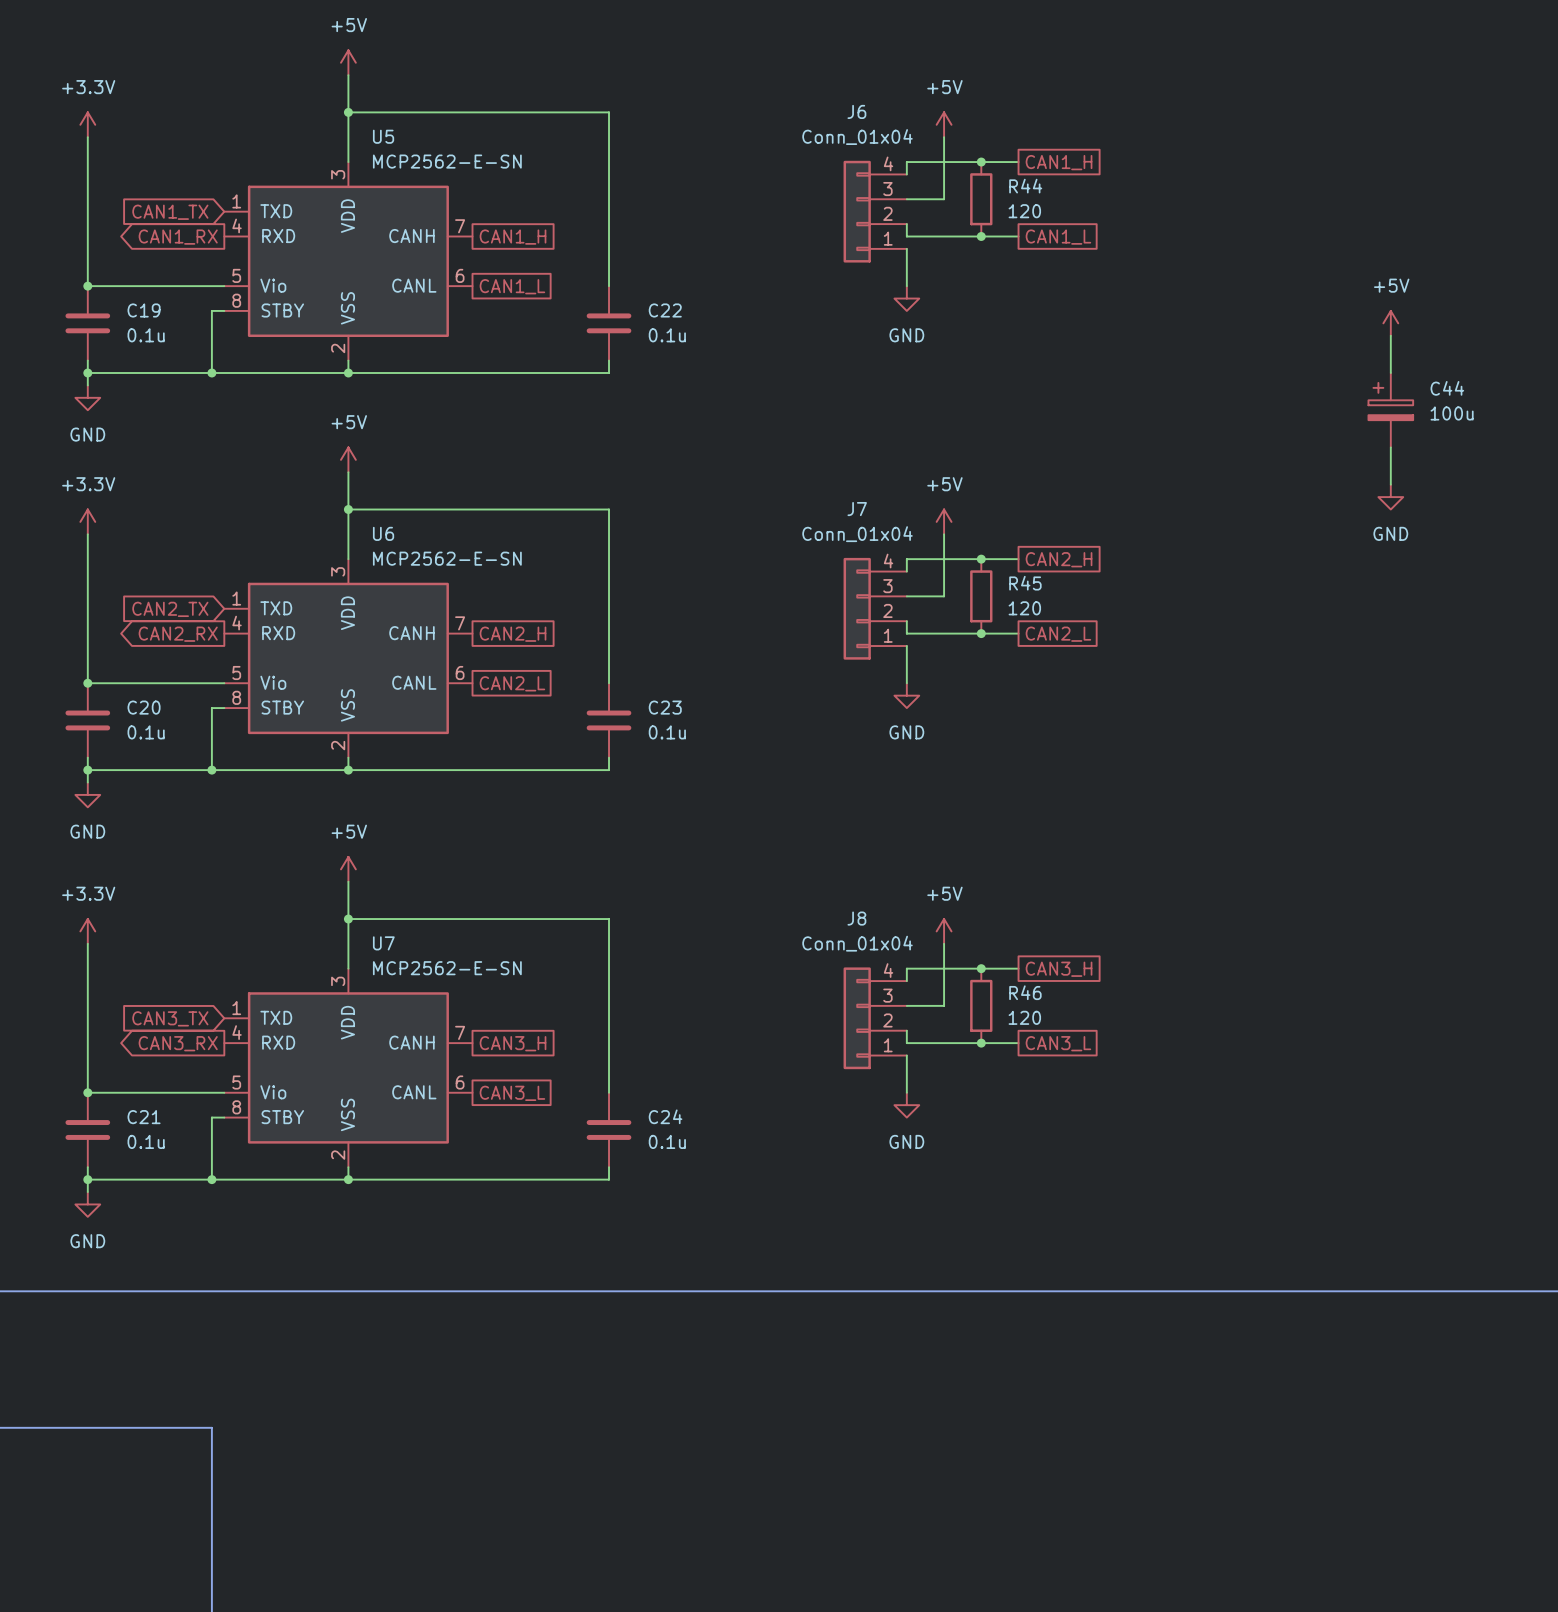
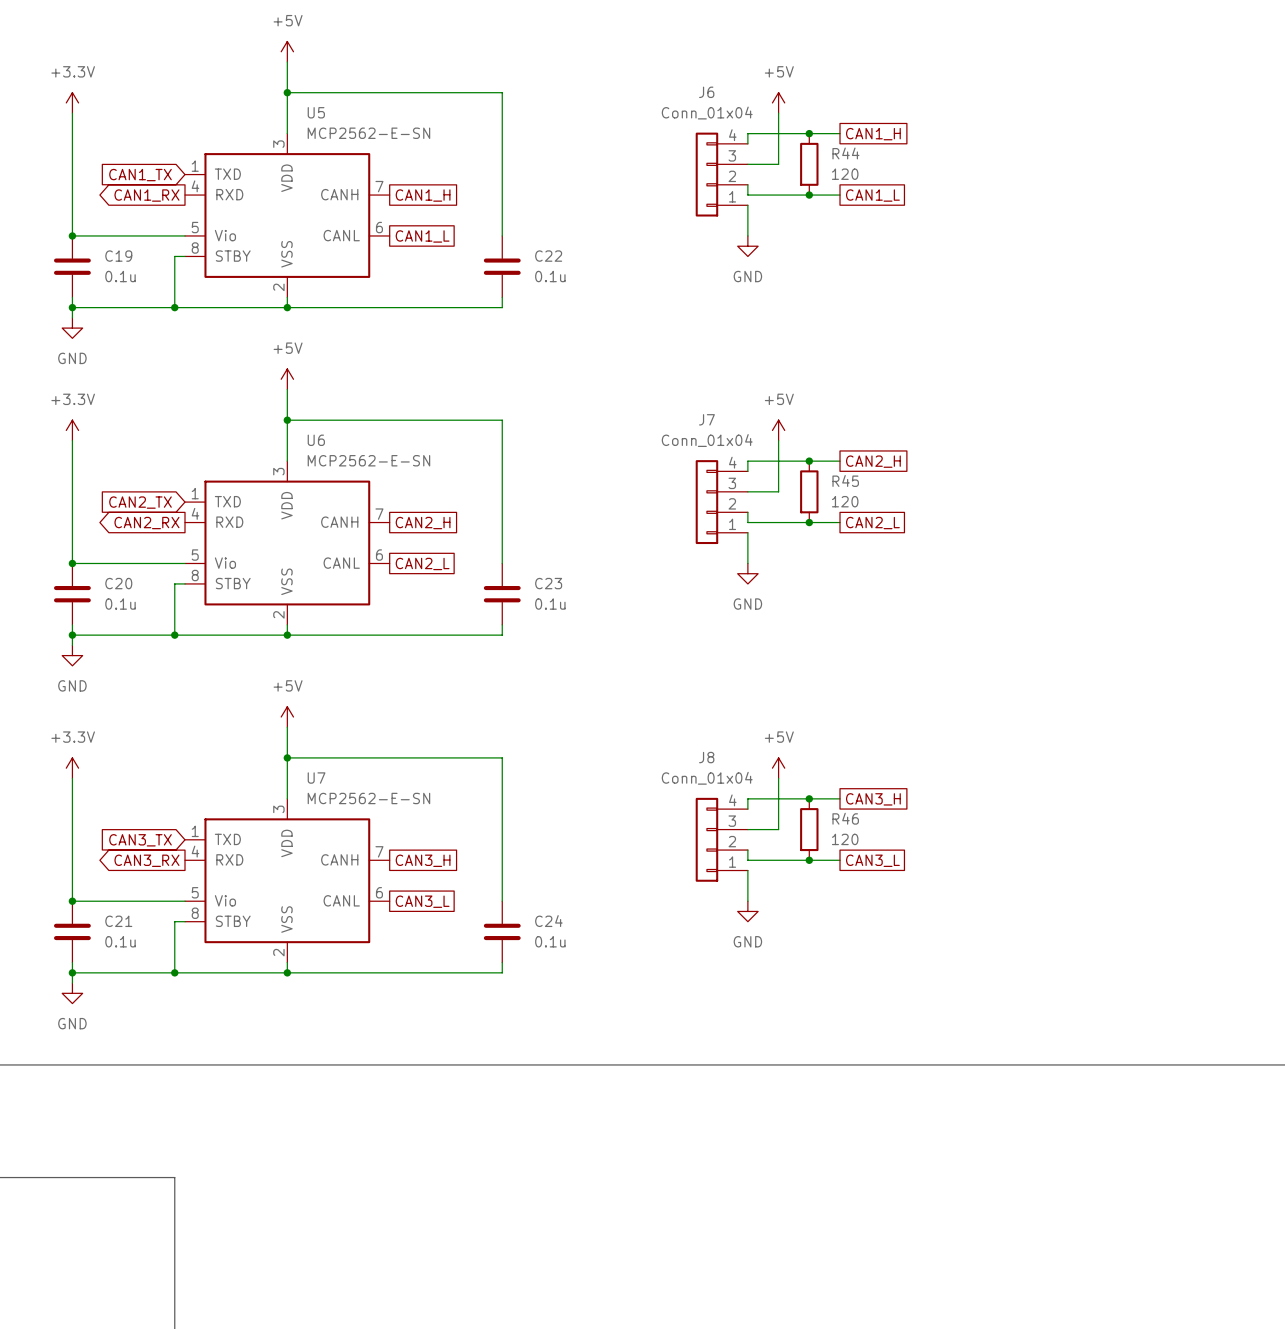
power symbol: +5V (1390, 323) -> none
wire: (1390, 335) (1390, 373) -> none
C44: 100u (1390, 410) -> none
wire: (1390, 447) (1390, 484) -> none
power symbol: GND (1390, 497) -> none

